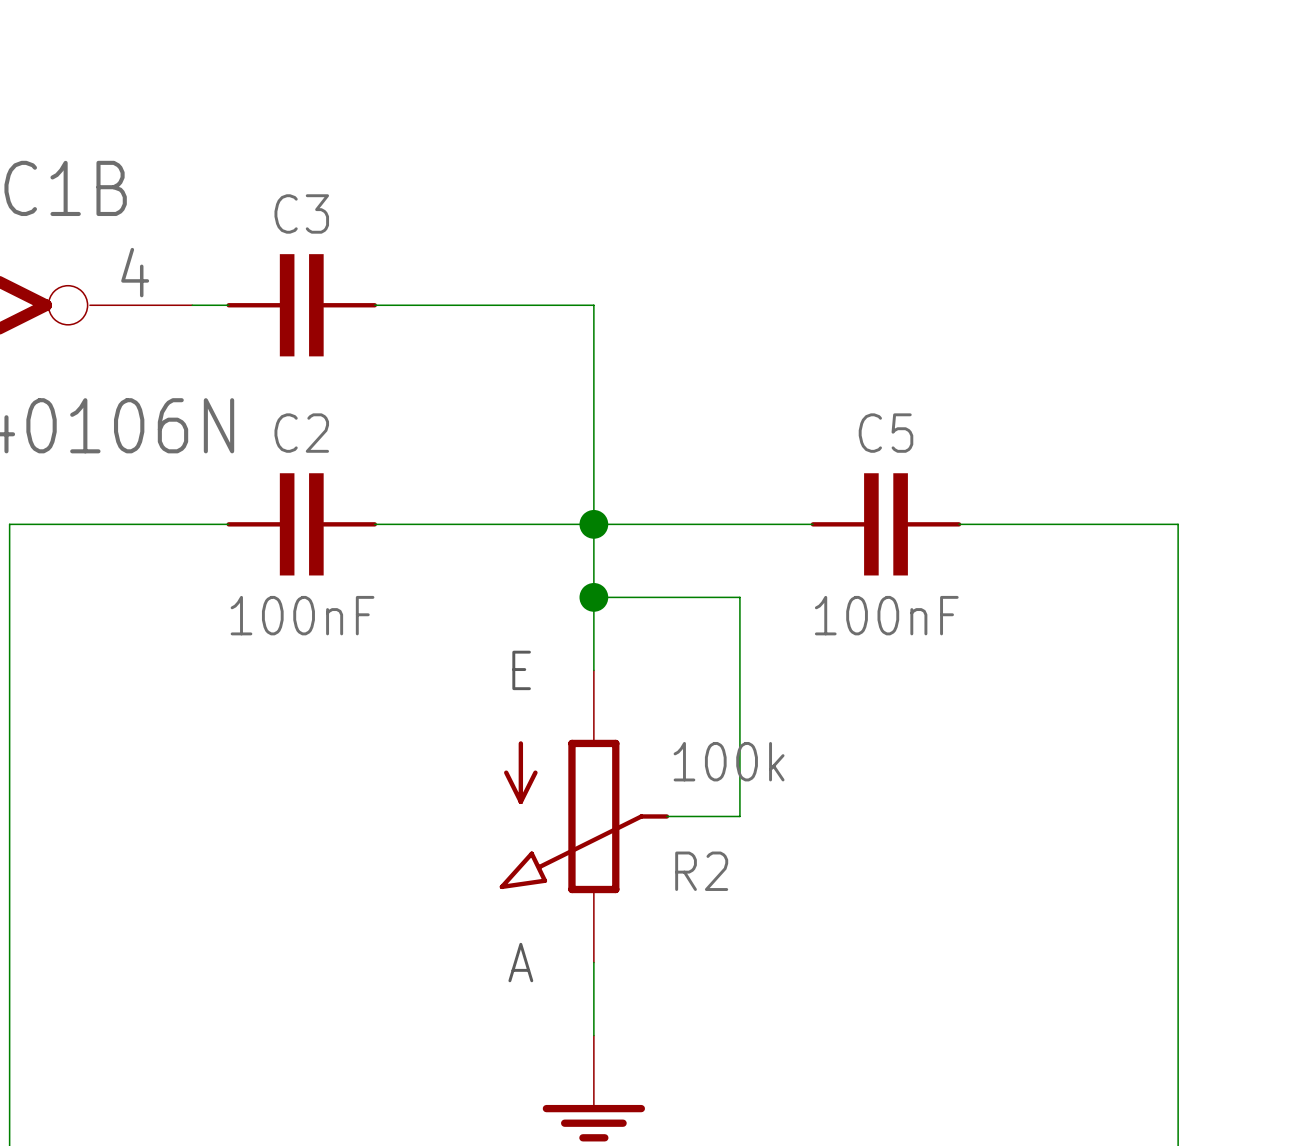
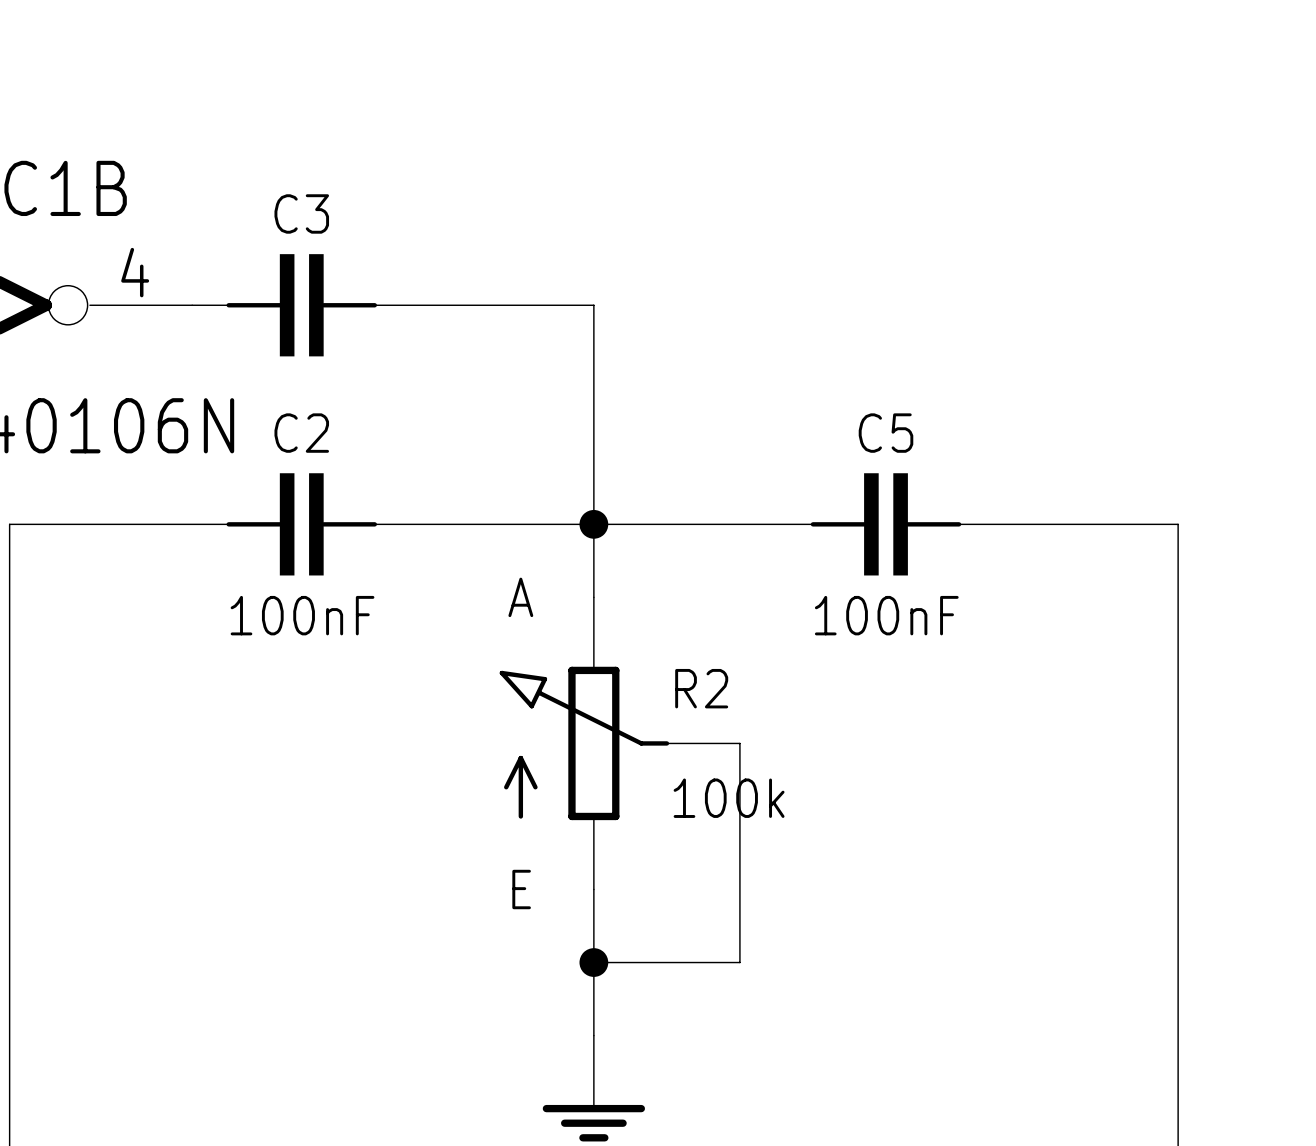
junction: (593, 597) -> none
R2 symbol: [499, 670, 670, 963] -> [499, 597, 670, 890]
wire: (593, 670) (593, 597) (739, 597) (739, 743) -> (666, 743) (739, 743)
R2 value position: 100k (729, 761) -> 100k (729, 798)
wire: (666, 816) (739, 816) -> (593, 889) (593, 962) (739, 962) (739, 816)
R2 name position: R2 (701, 871) -> R2 (701, 688)
junction: none -> (593, 962)

